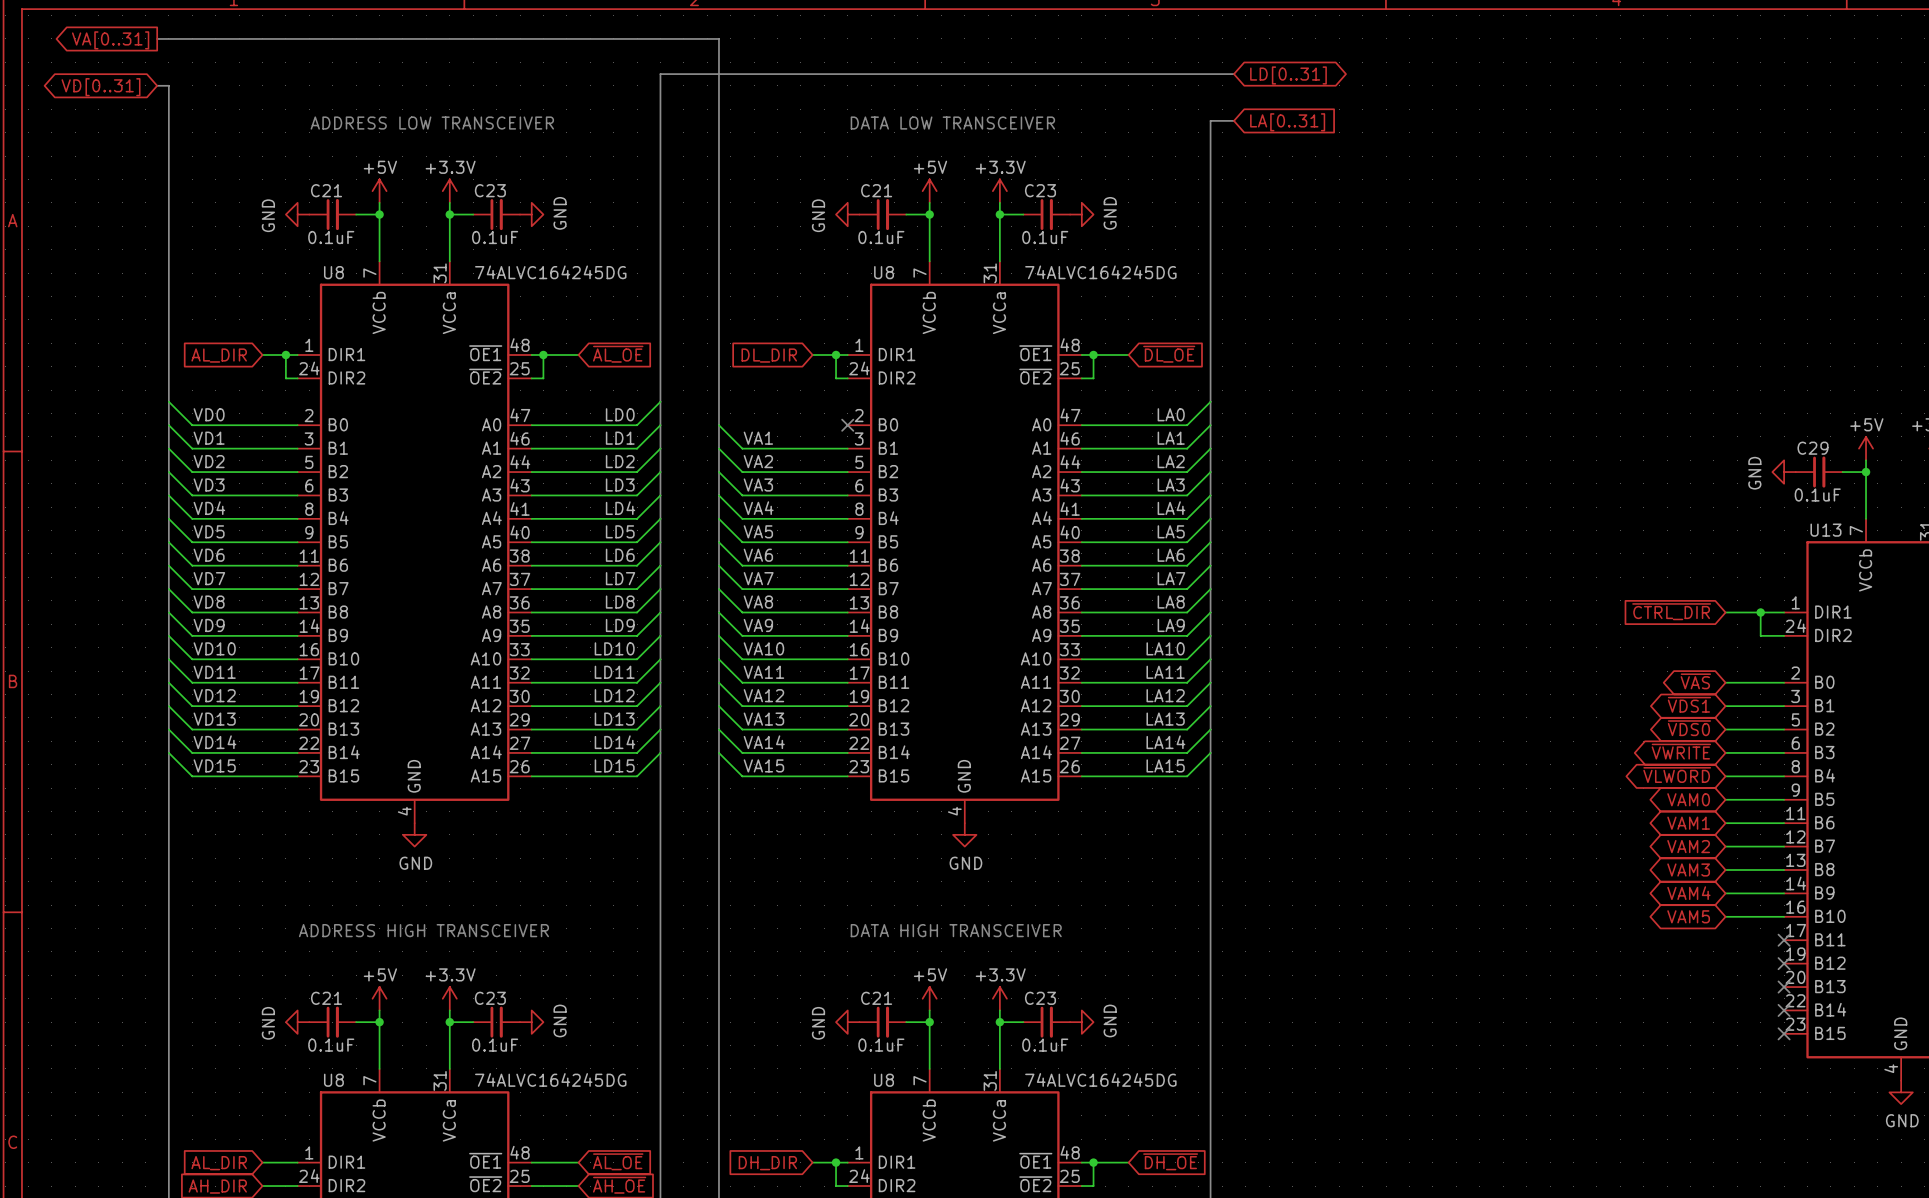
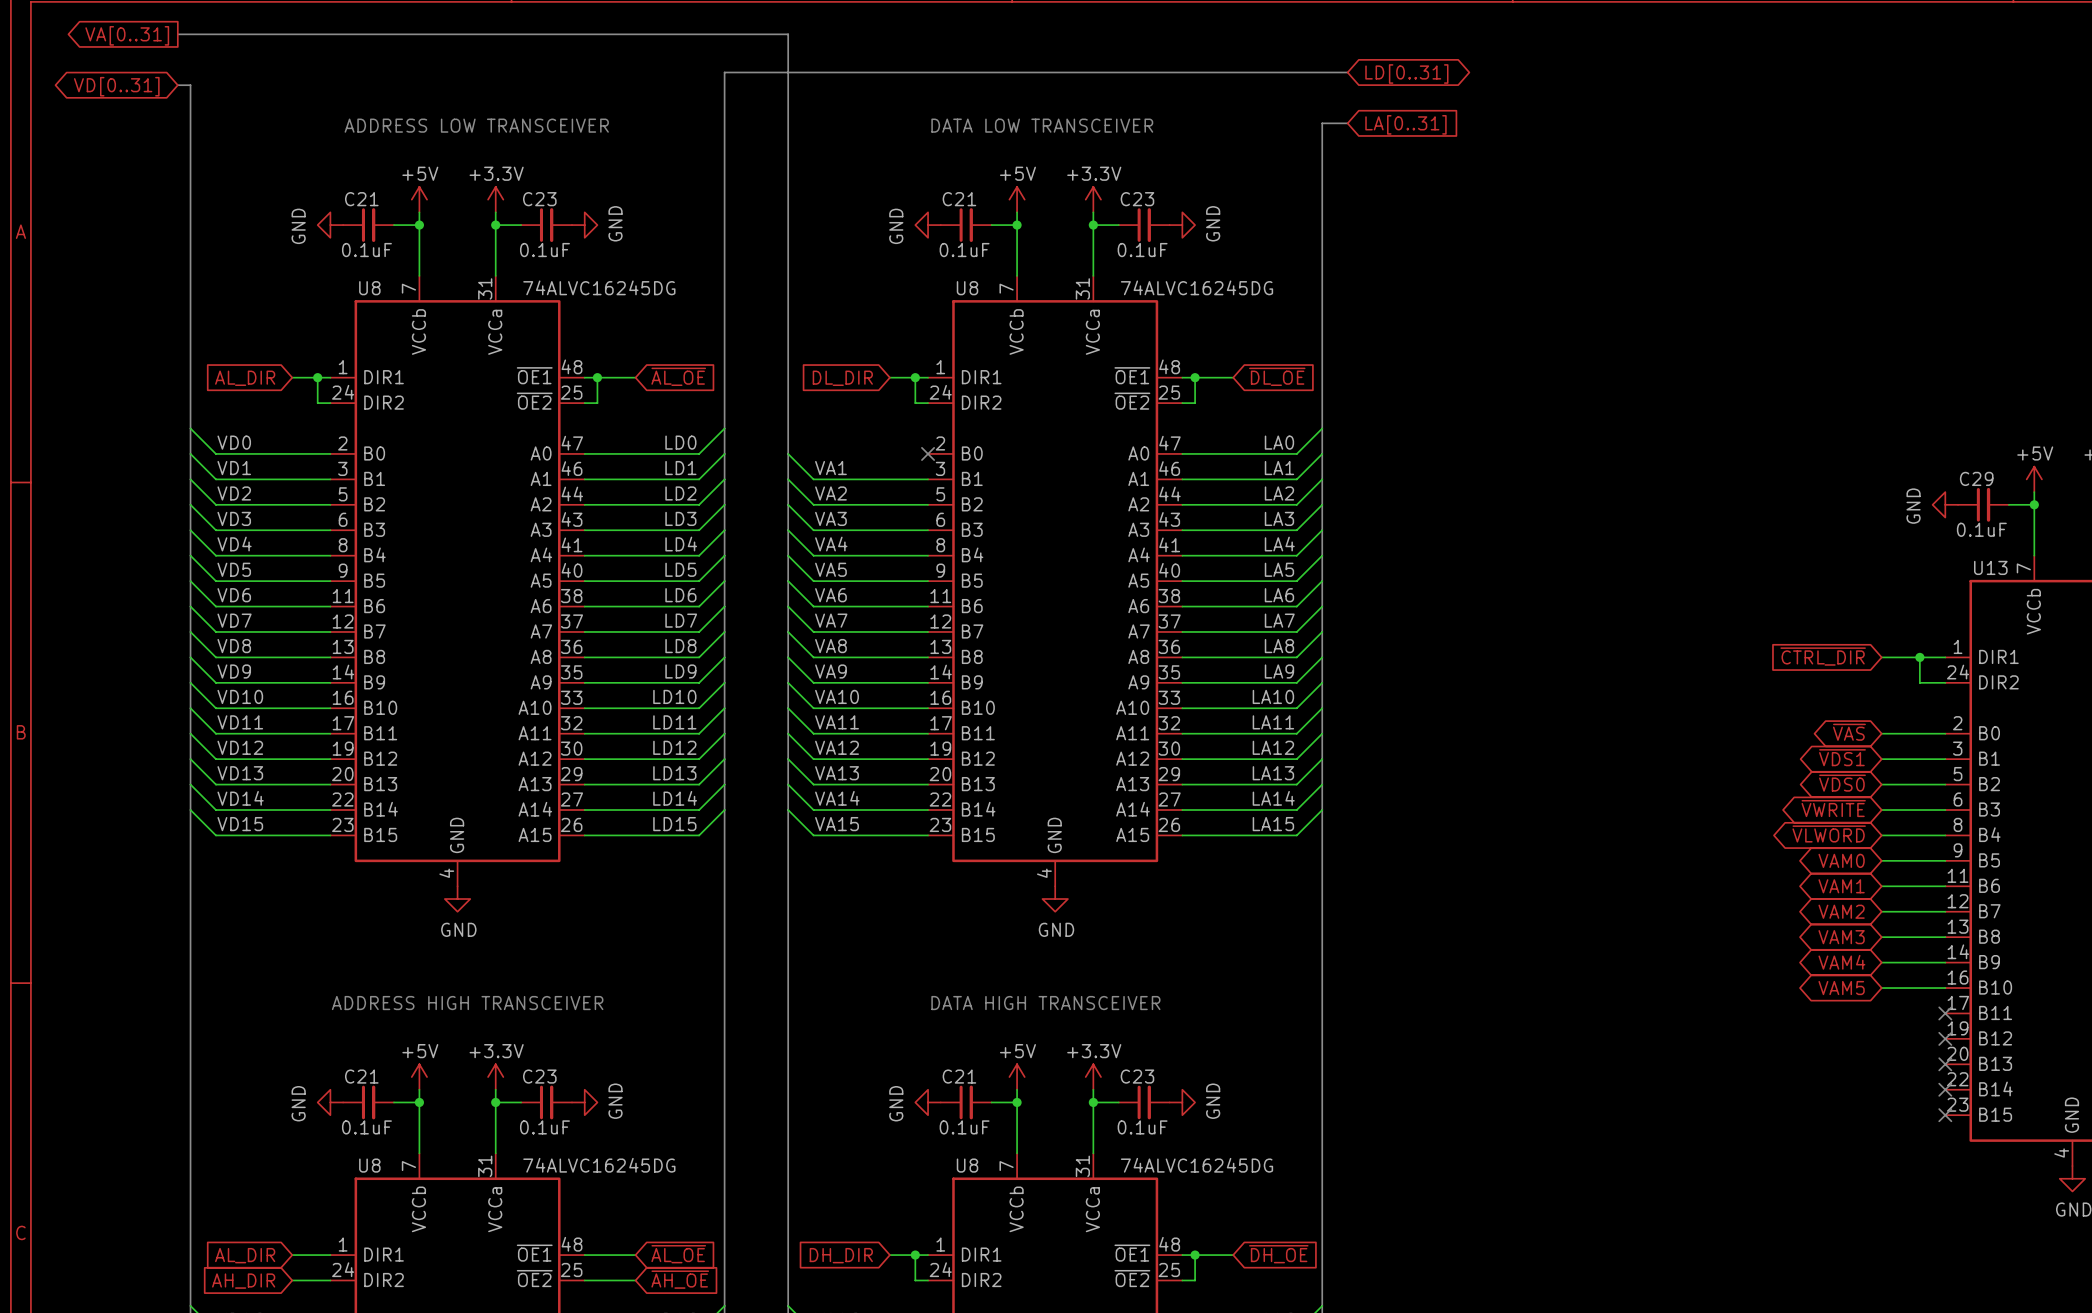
U8 value: 74ALVC164245DG (550, 272) -> 74ALVC16245DG (599, 287)
U8 value: 74ALVC164245DG (1100, 272) -> 74ALVC16245DG (1196, 287)
U8 value: 74ALVC164245DG (550, 1079) -> 74ALVC16245DG (599, 1165)
U8 value: 74ALVC164245DG (1100, 1079) -> 74ALVC16245DG (1196, 1165)

